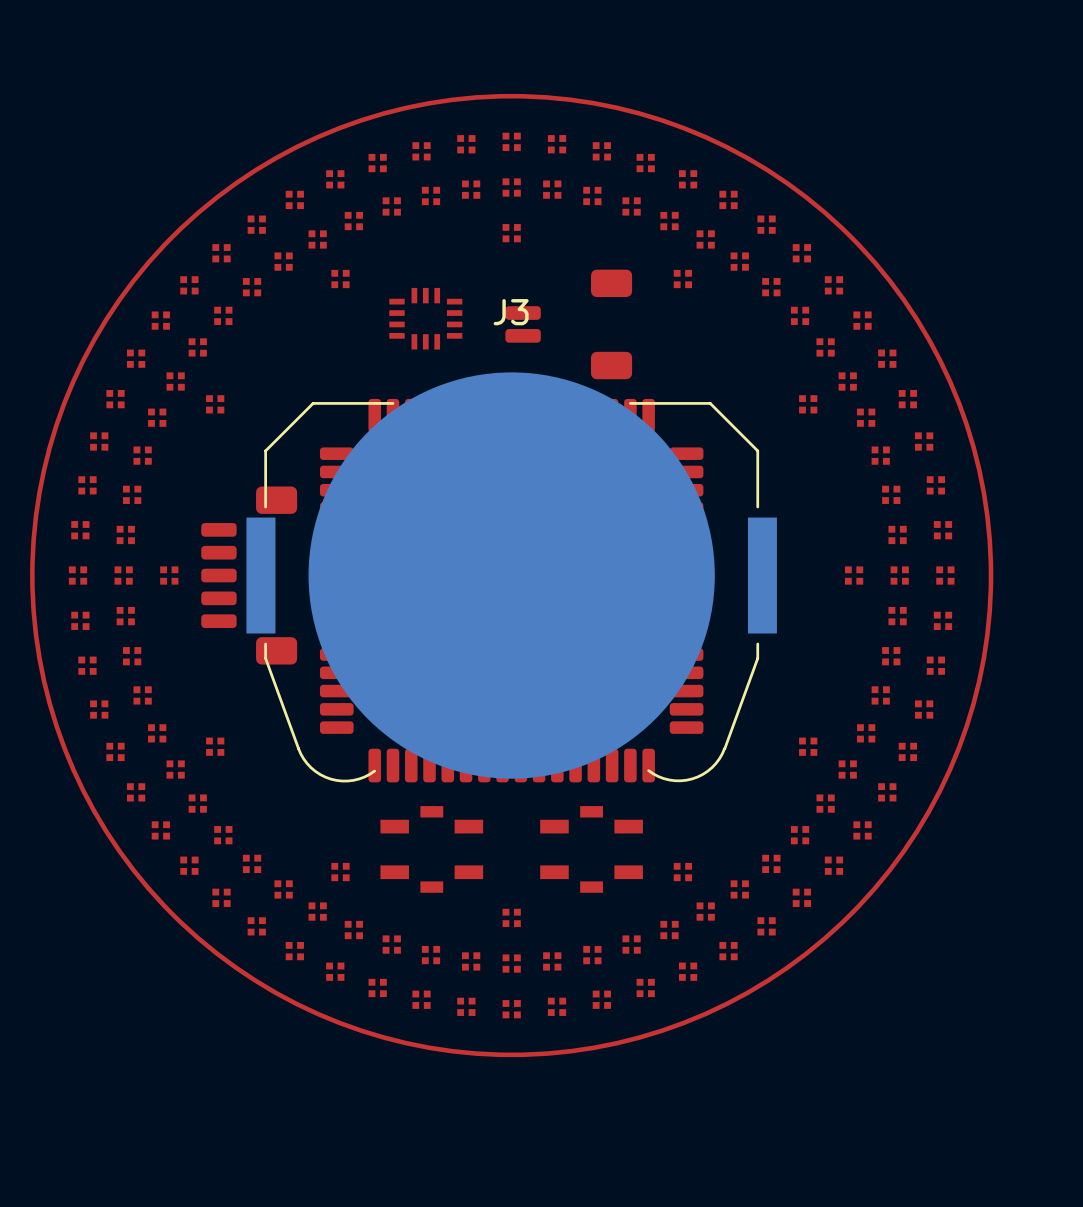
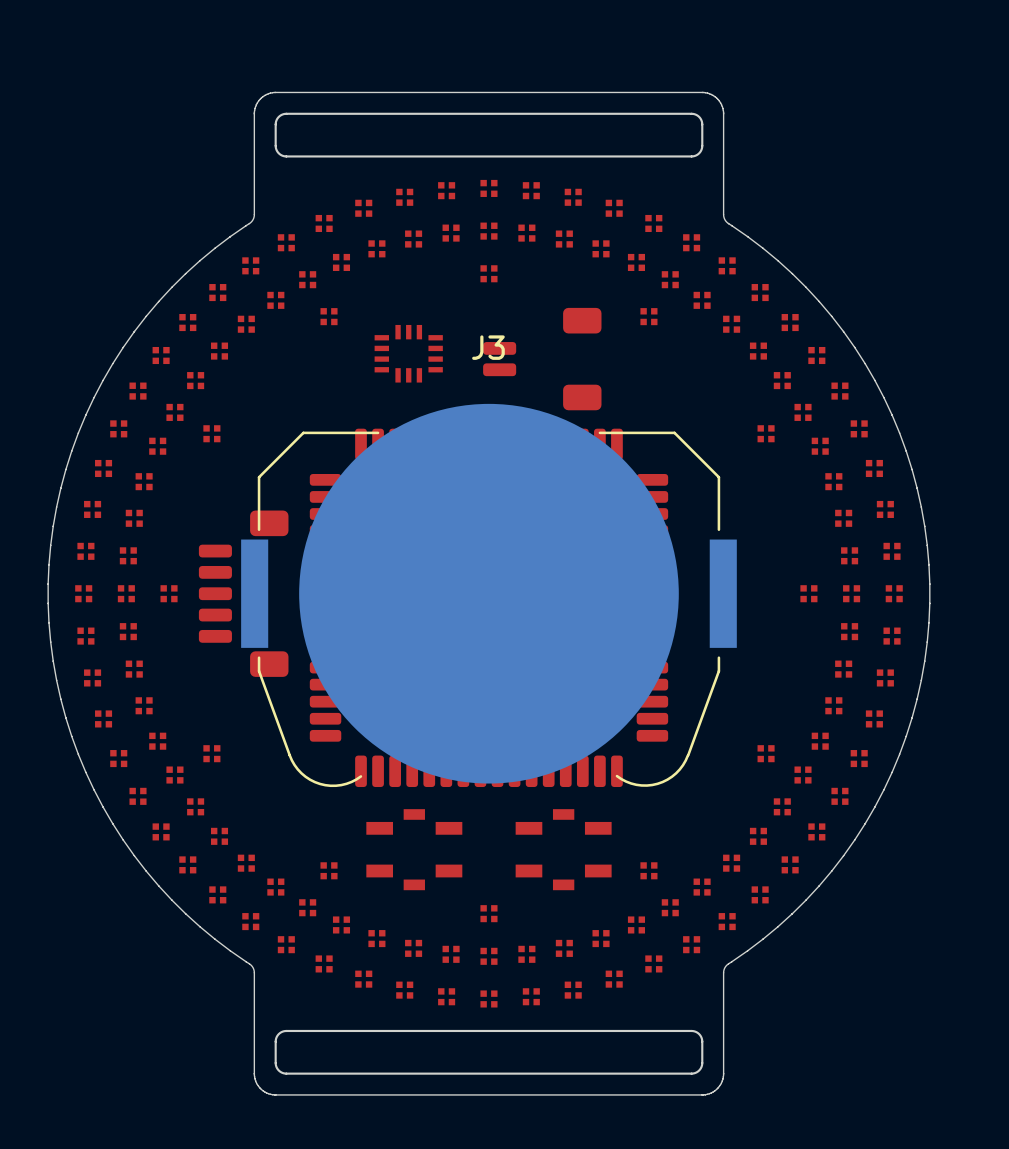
board edge: none -> (703, 92) (275, 92) (265, 94) (258, 101) (254, 111) (253, 219) (199, 260) (158, 301) (134, 331) (112, 363) (85, 415) (71, 451) (60, 488) (53, 526) (49, 564) (48, 603) (50, 641) (60, 699) (78, 754) (93, 789) (112, 823) (134, 855) (158, 885) (185, 913) (214, 939) (253, 967) (254, 1075) (258, 1086) (266, 1092) (275, 1094) (702, 1094) (712, 1092) (719, 1086) (723, 1075) (724, 967) (778, 926) (819, 885) (843, 855) (865, 823) (892, 772) (906, 736) (917, 699) (924, 661) (928, 622) (929, 584) (927, 545) (921, 507) (912, 469) (899, 432) (883, 397) (865, 363) (843, 331) (819, 301) (792, 273) (763, 248) (724, 219) (723, 110) (716, 98) (703, 92)
board edge: none -> (691, 113) (284, 113) (279, 116) (276, 121) (275, 147) (279, 154) (286, 156) (693, 156) (698, 154) (701, 148) (702, 124) (699, 116) (691, 113)
drawing: [30, 93, 994, 1058] -> none
board edge: none -> (691, 1030) (284, 1031) (279, 1033) (276, 1038) (275, 1064) (278, 1070) (286, 1073) (693, 1073) (698, 1071) (701, 1065) (702, 1041) (699, 1034) (691, 1030)

